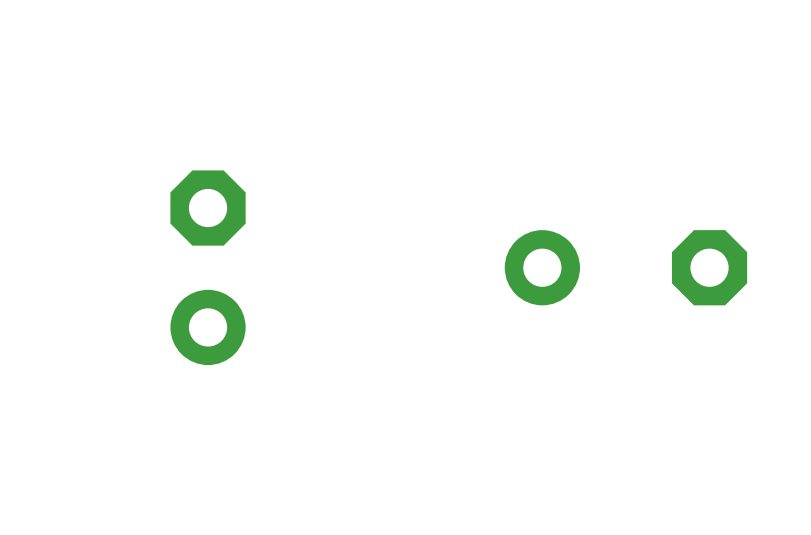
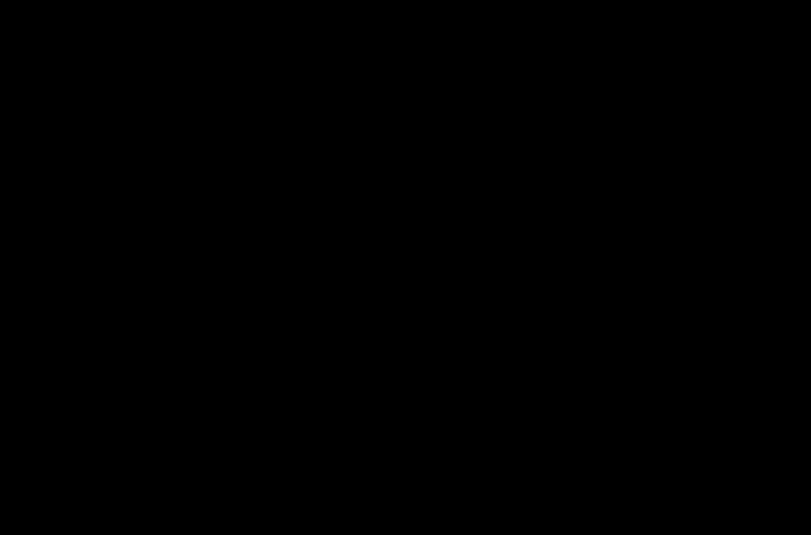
part: (208, 267) -> none
part: (625, 267) -> none

